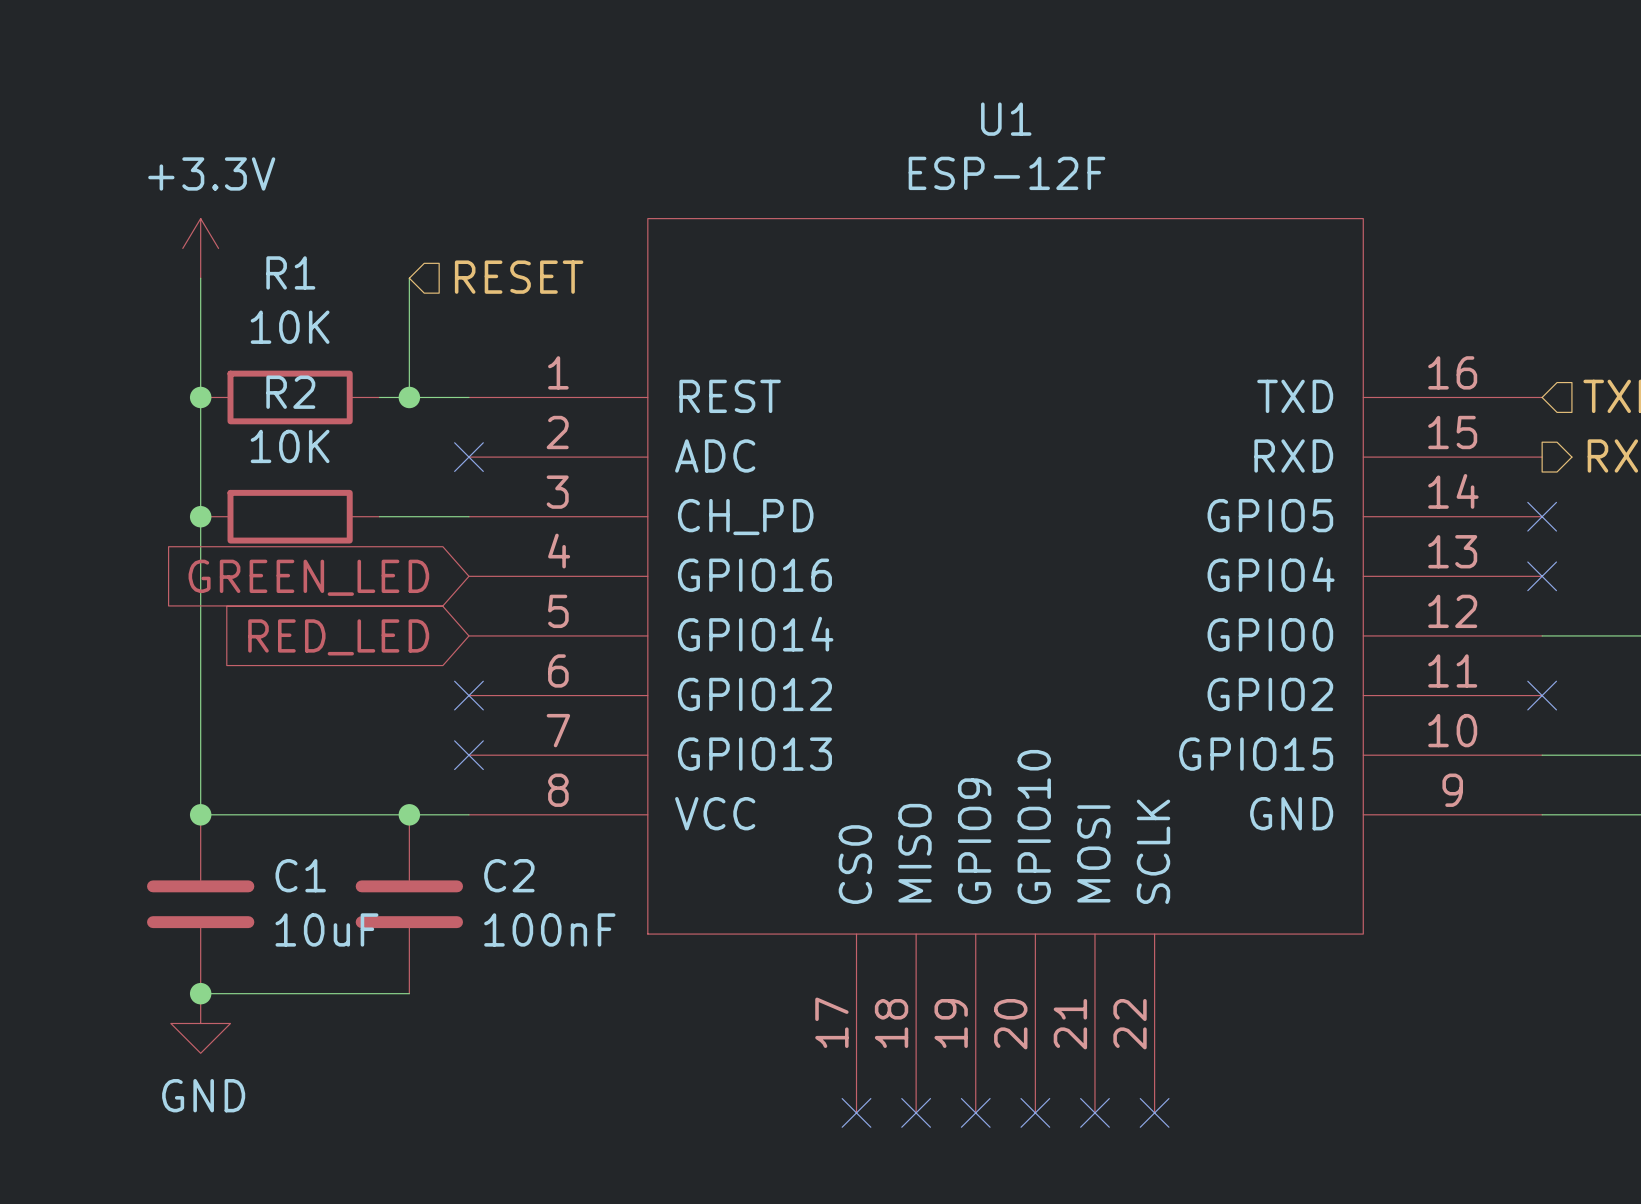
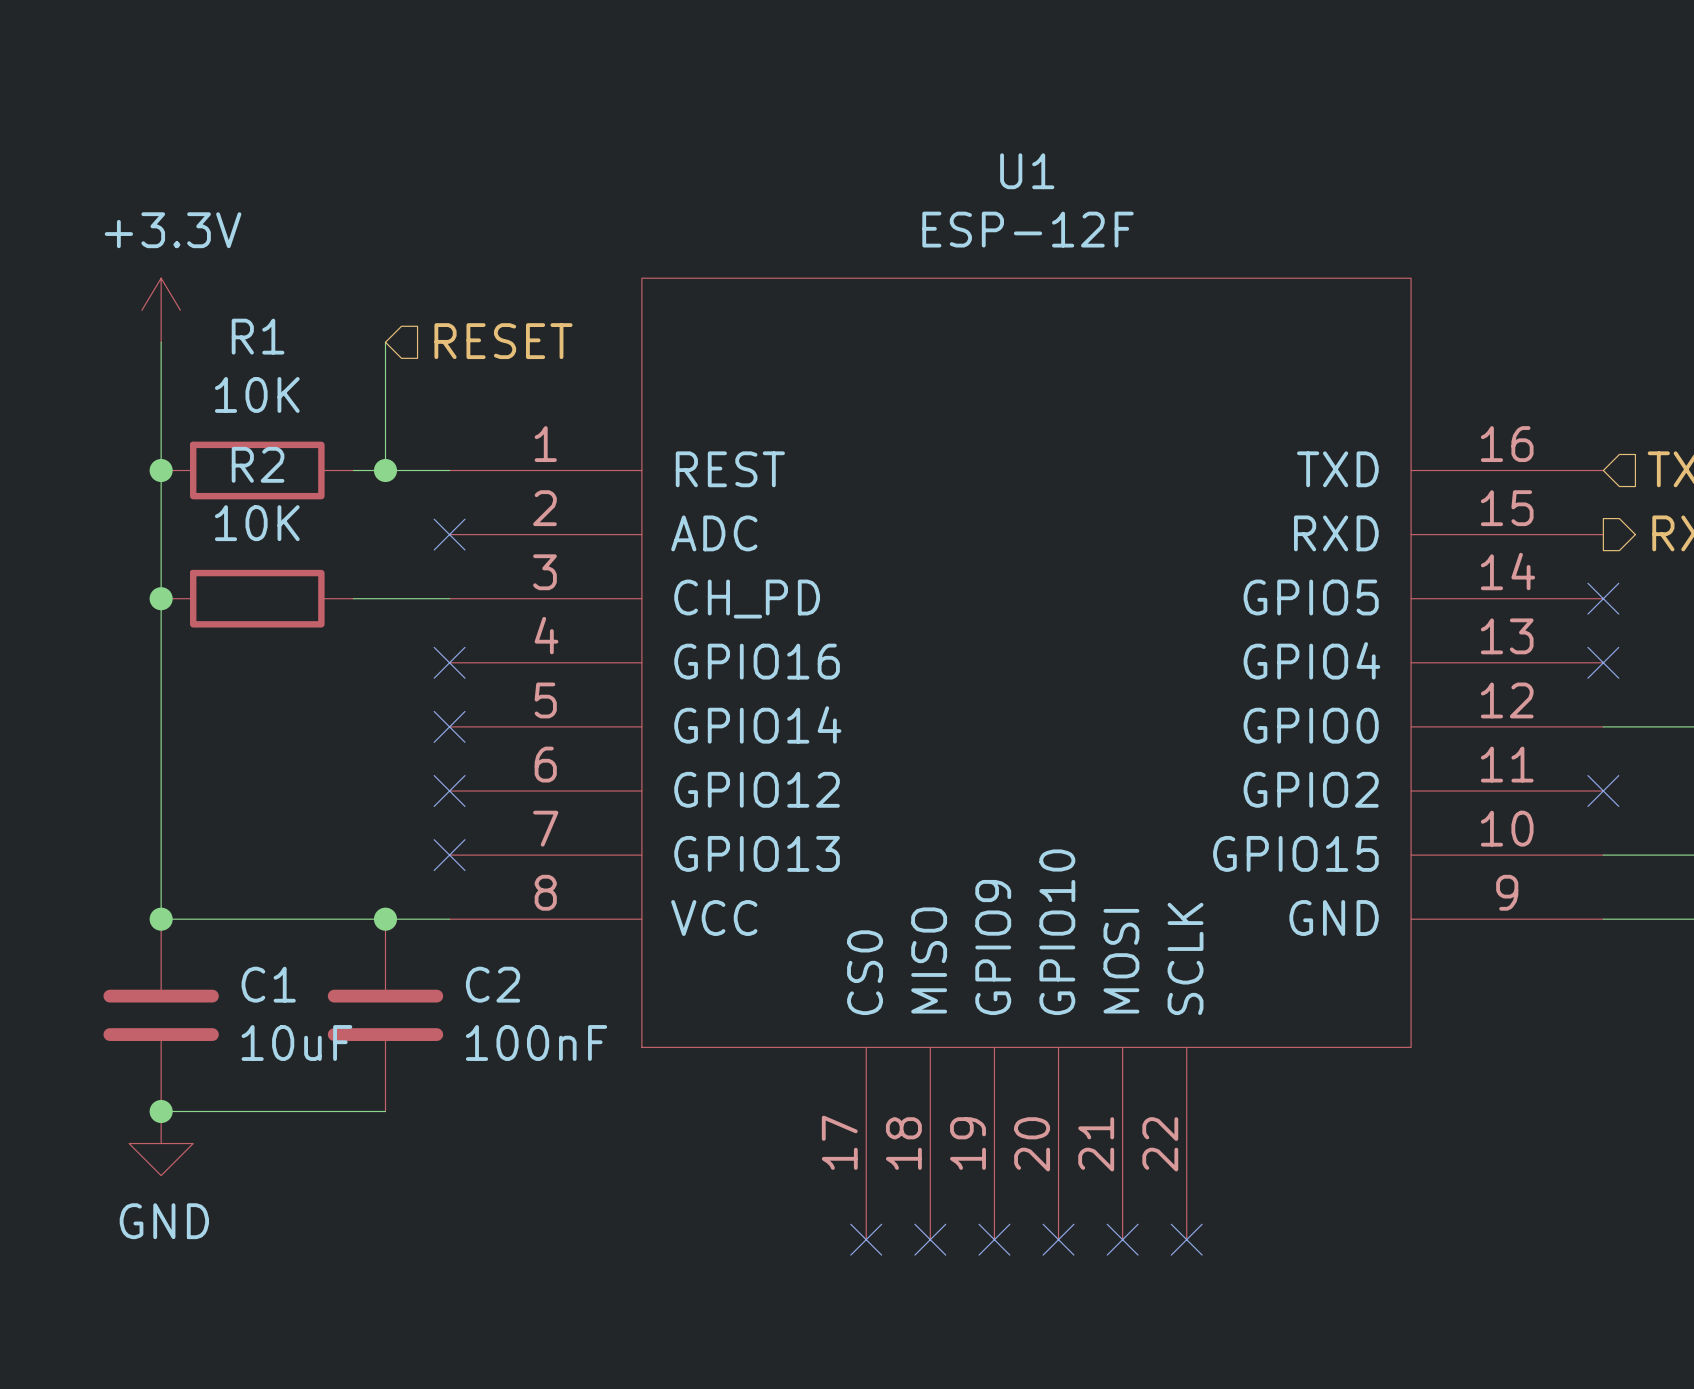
no-connect mark: none -> (449, 662)
global label: GREEN_LED (308, 577) -> none
no-connect mark: none -> (449, 726)
global label: RED_LED (338, 637) -> none

